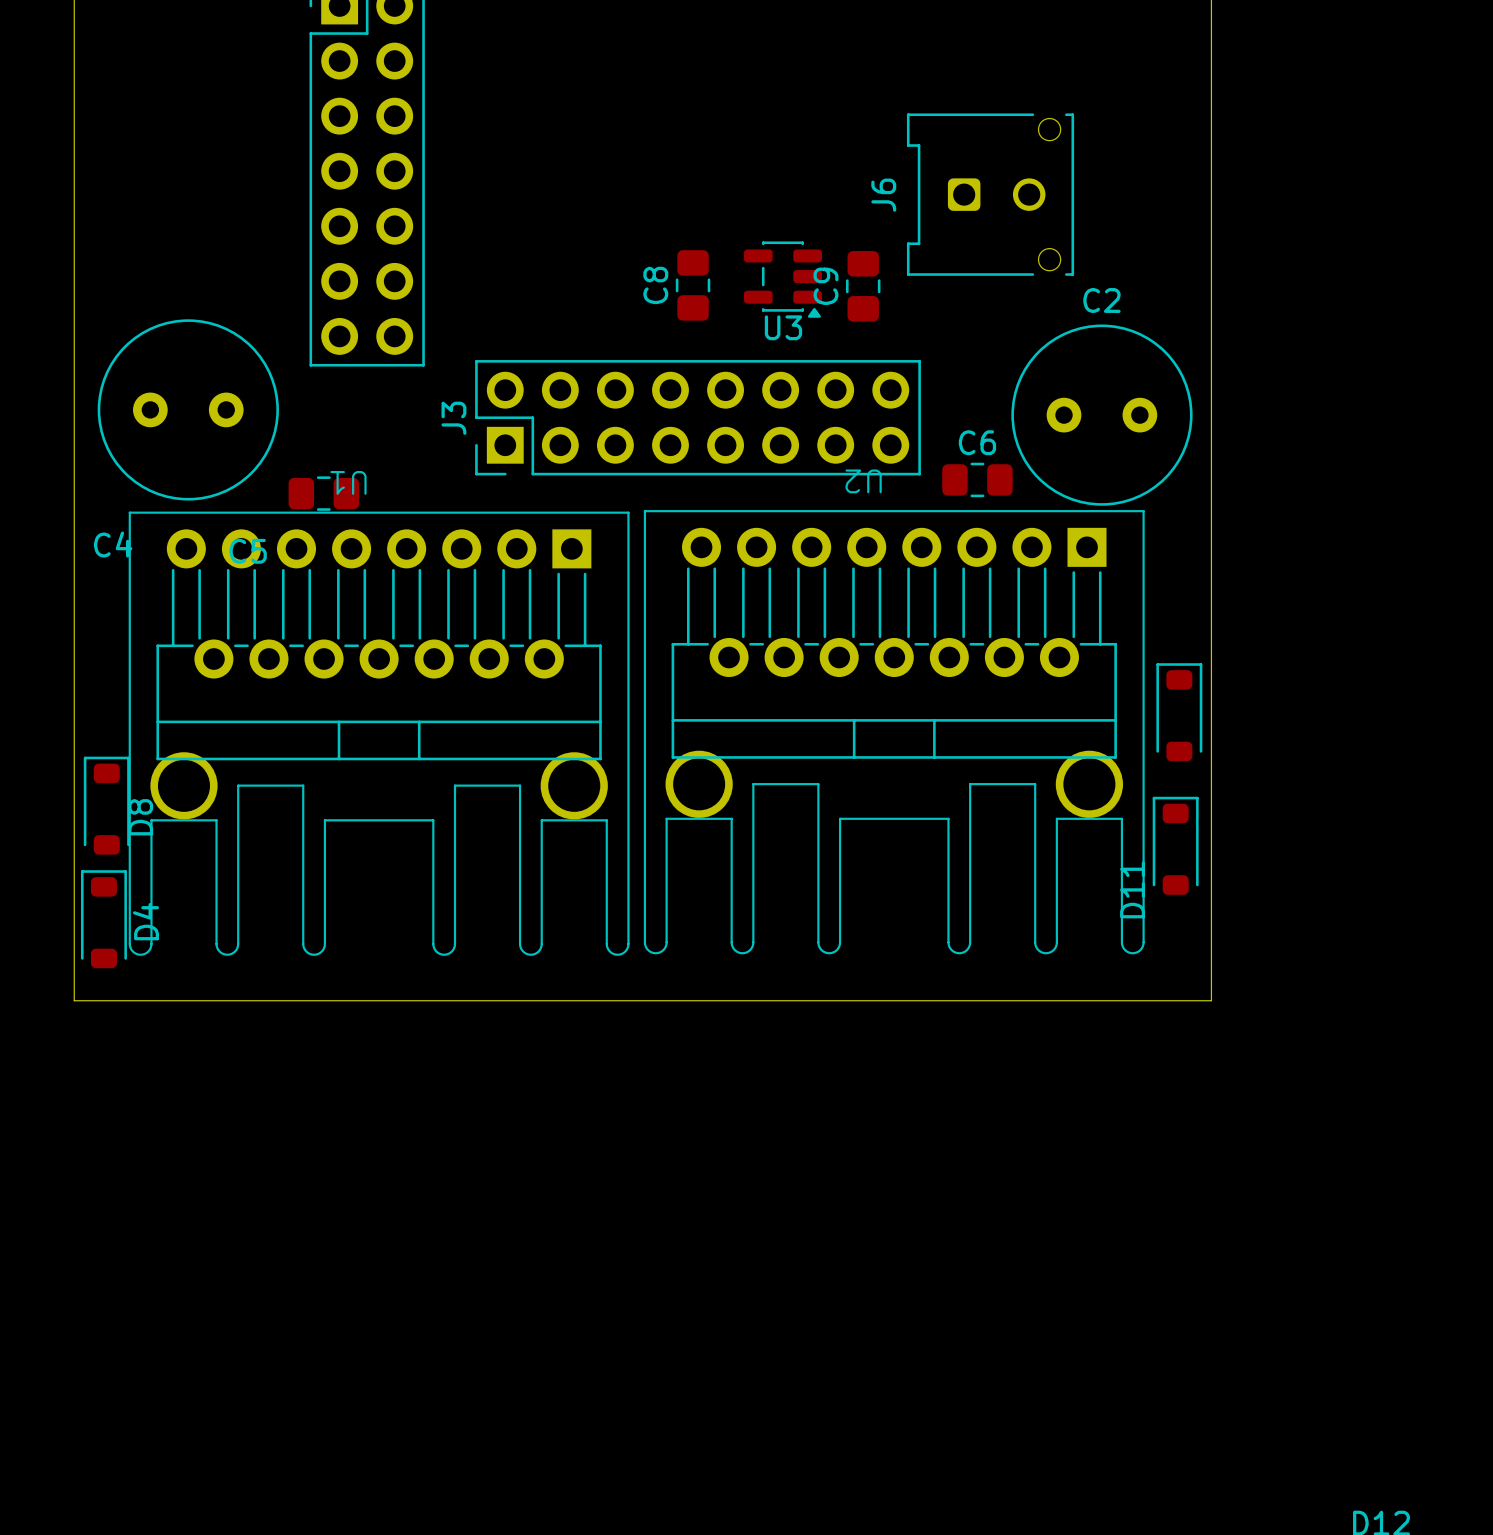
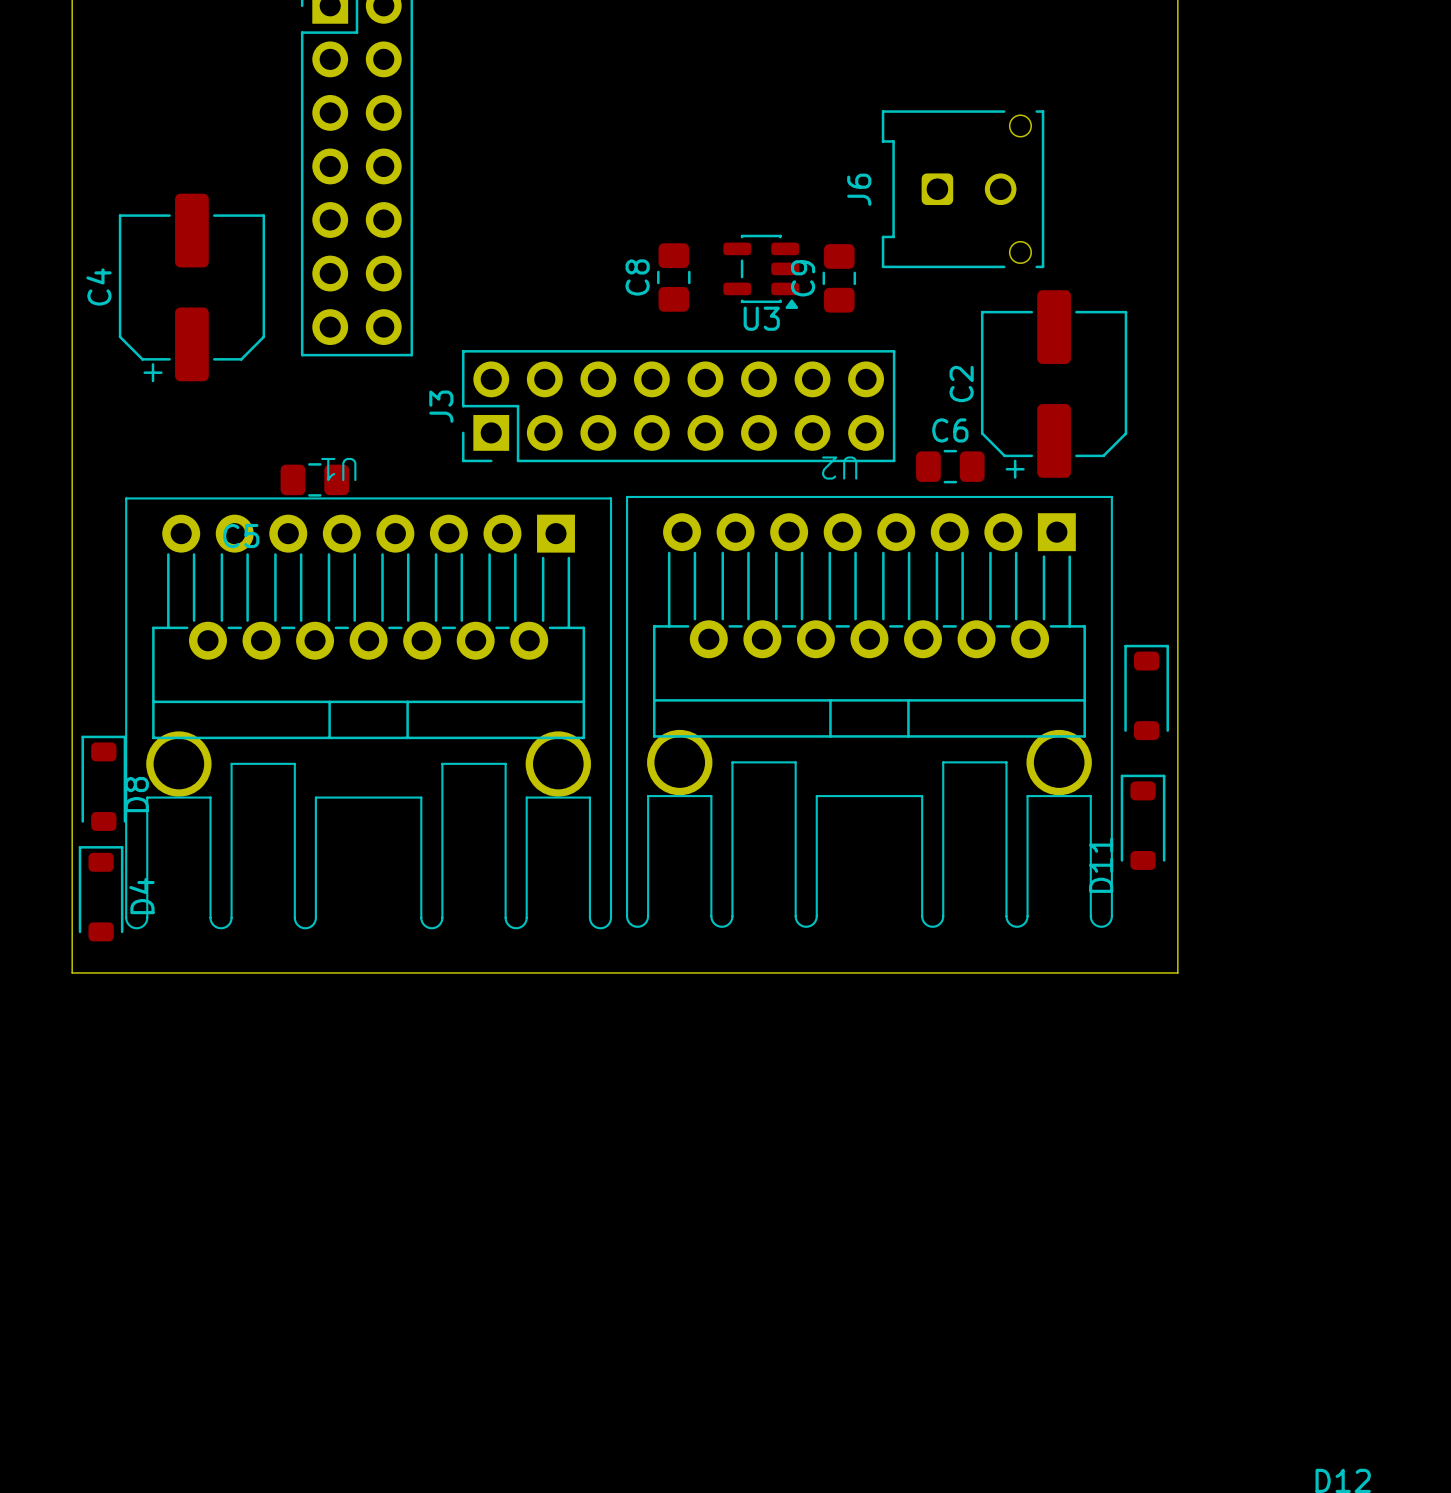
C2 name position: C2 (1101, 300) -> C2 (961, 384)
C4 footprint: [97, 319, 279, 501] -> [118, 193, 266, 383]
C2 footprint: [1011, 324, 1193, 506] -> [980, 290, 1128, 479]
C4 name position: C4 (113, 544) -> C4 (98, 286)

